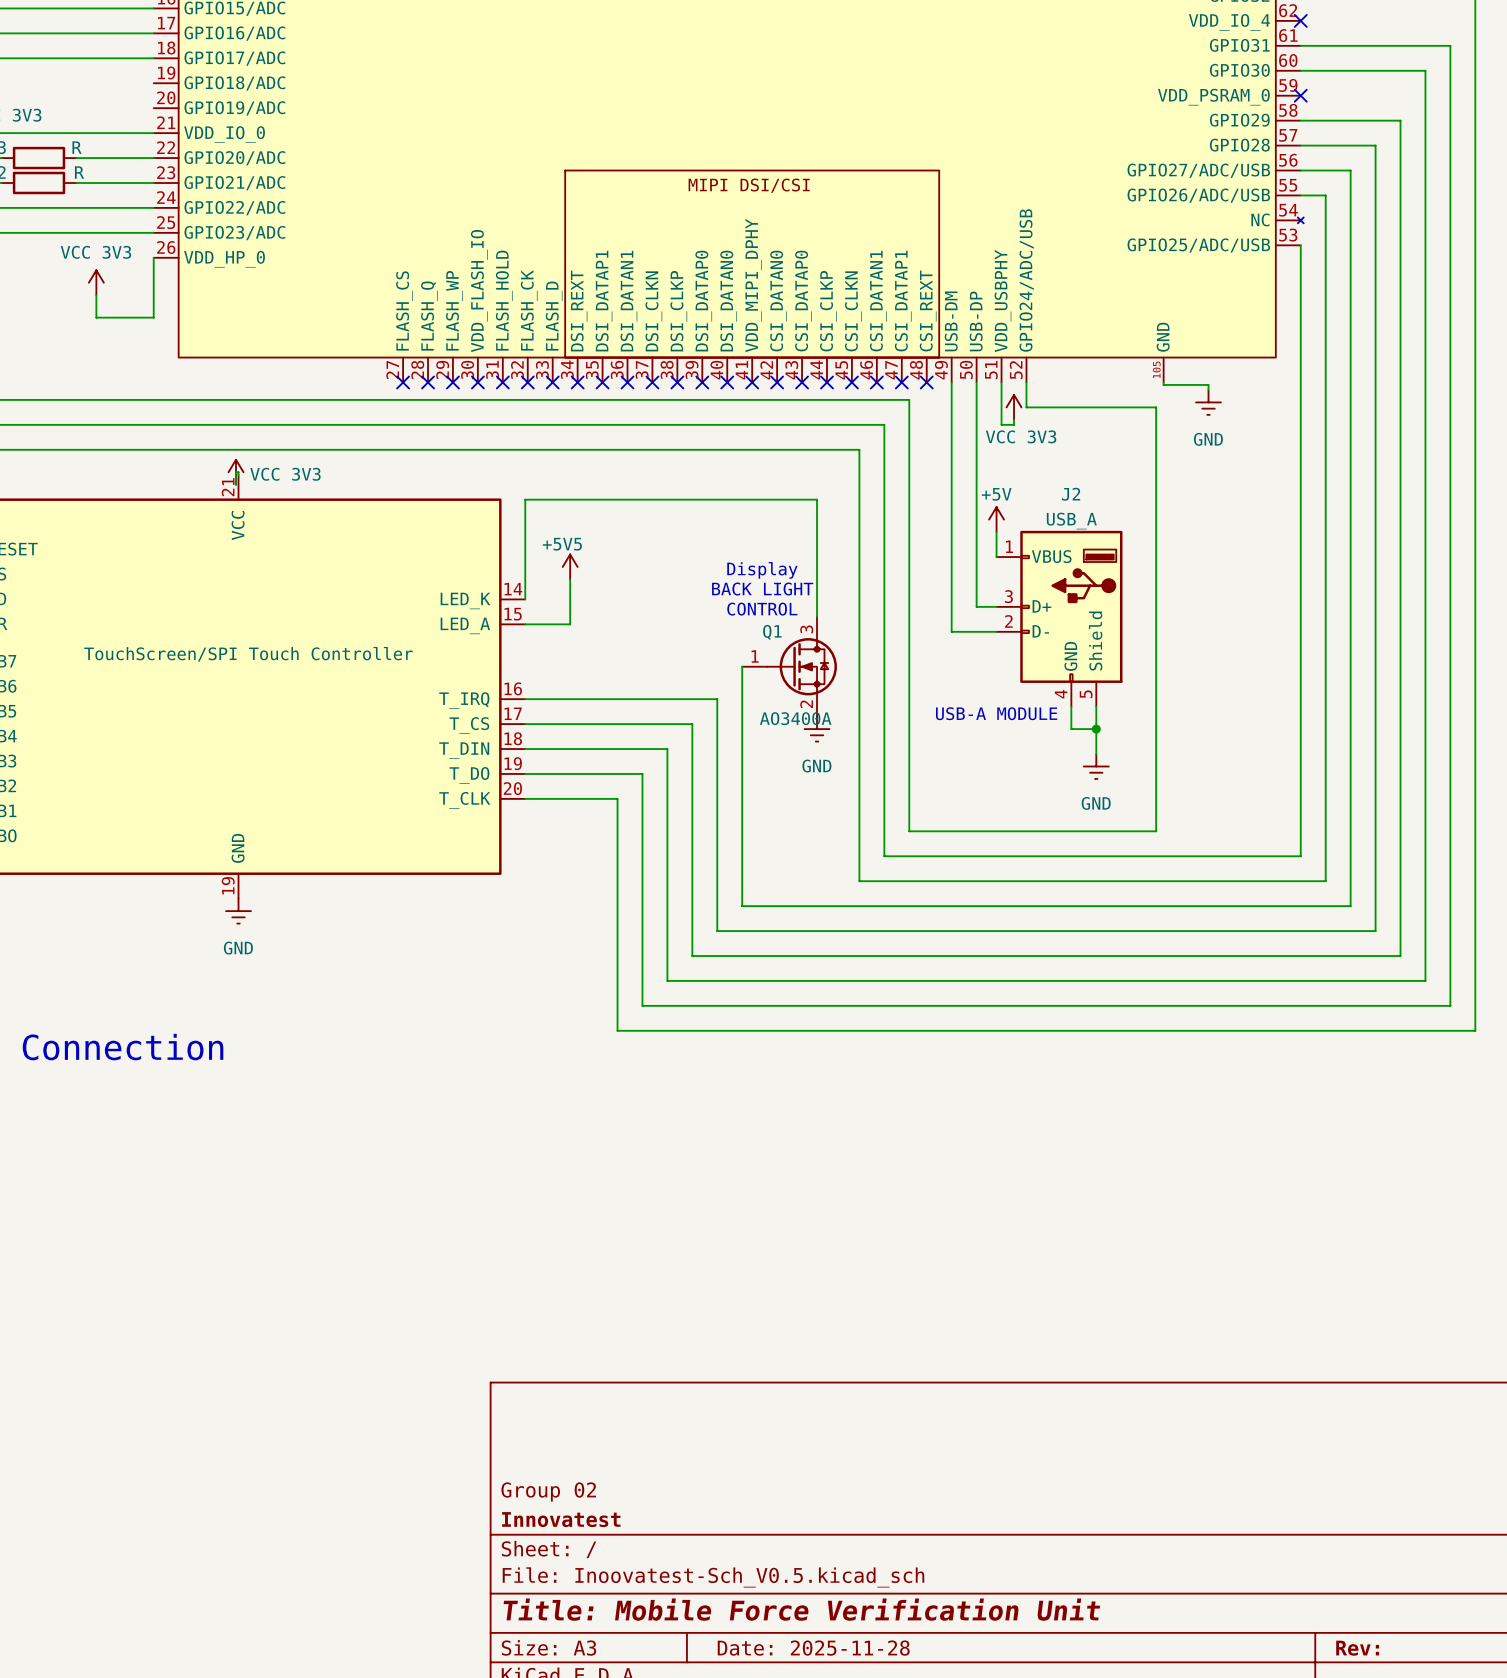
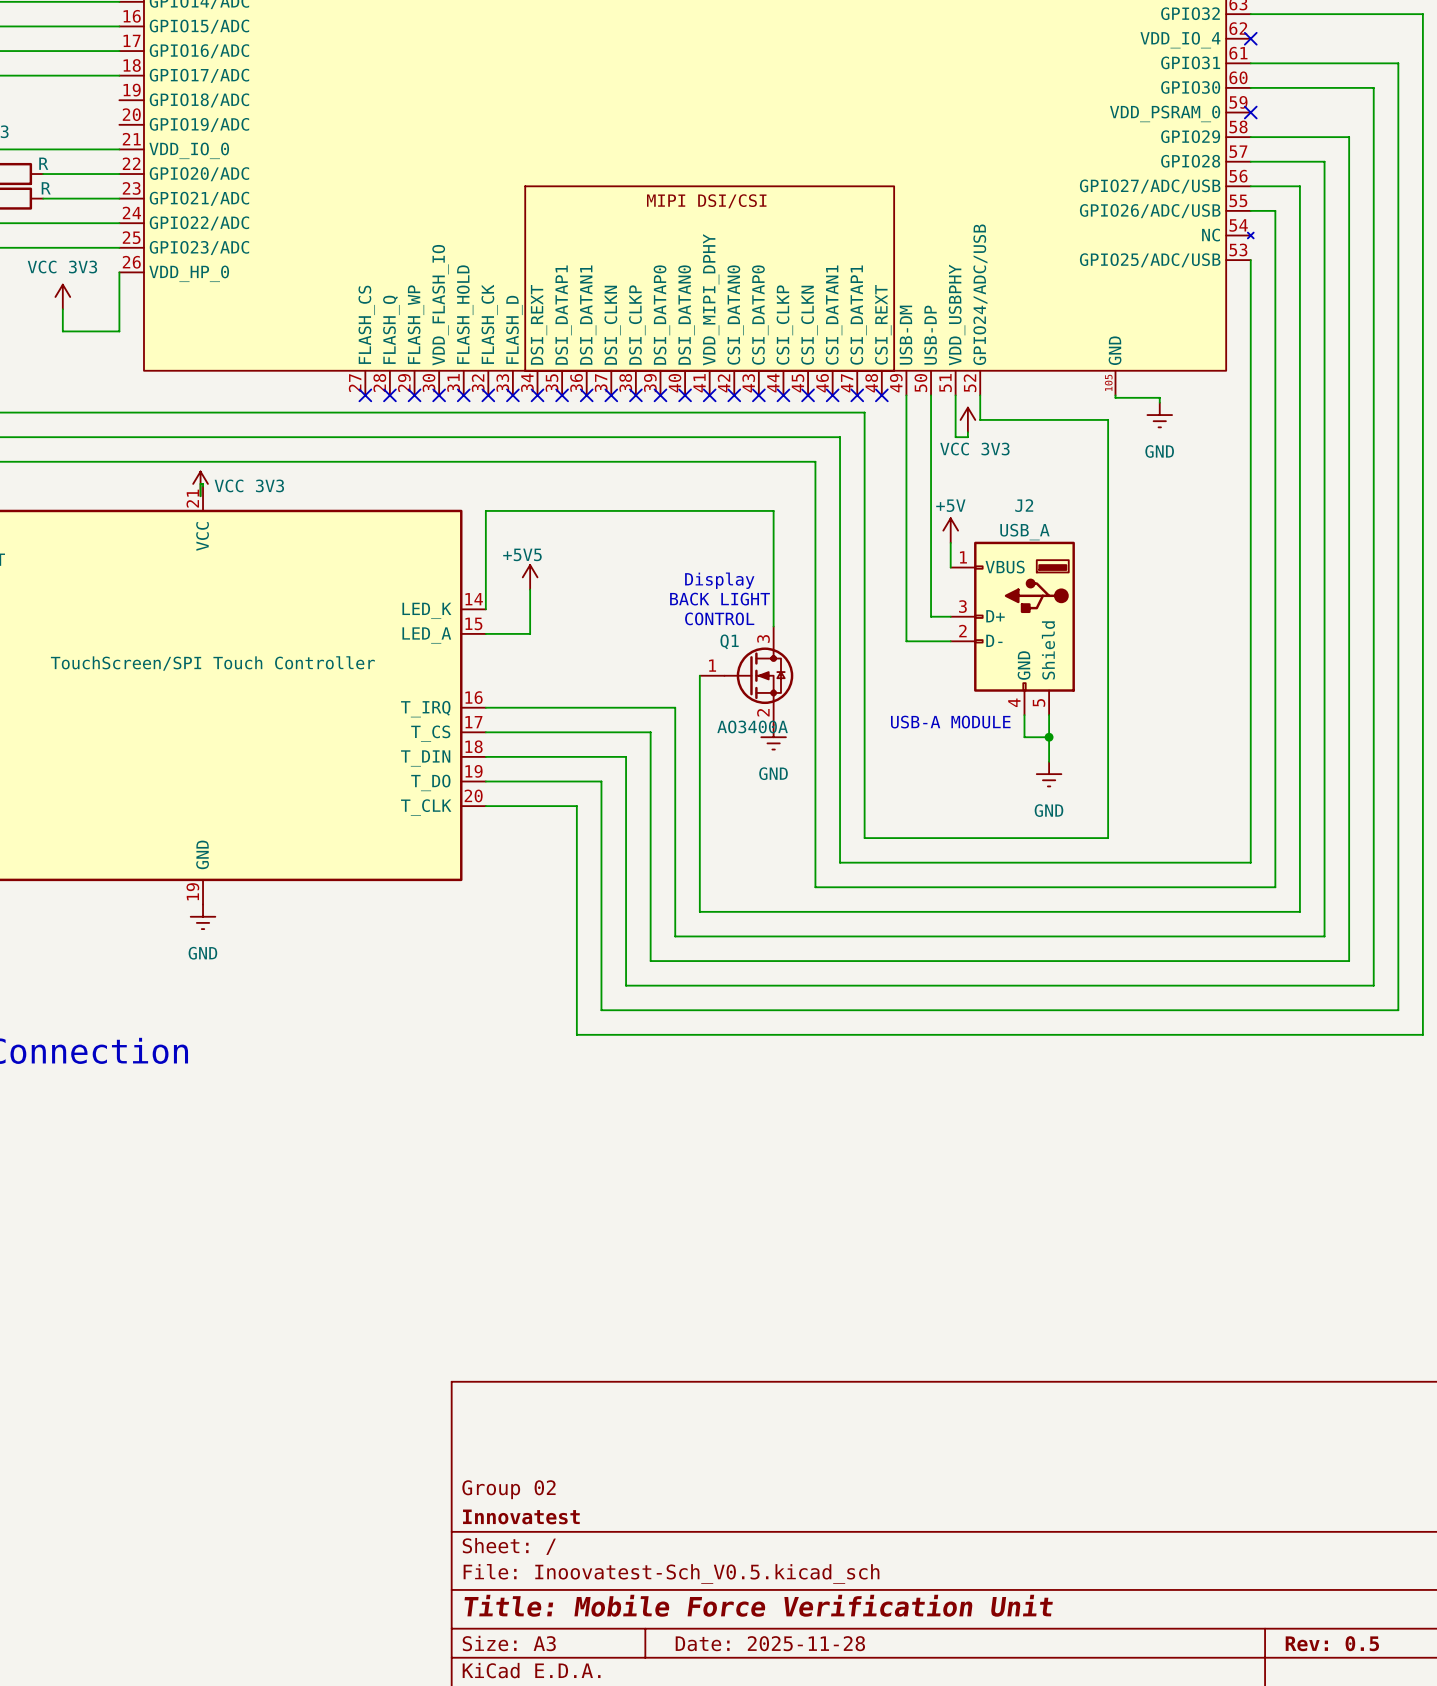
title block: Rev: (1357, 1648) -> Rev: 0.5 (1332, 1643)

